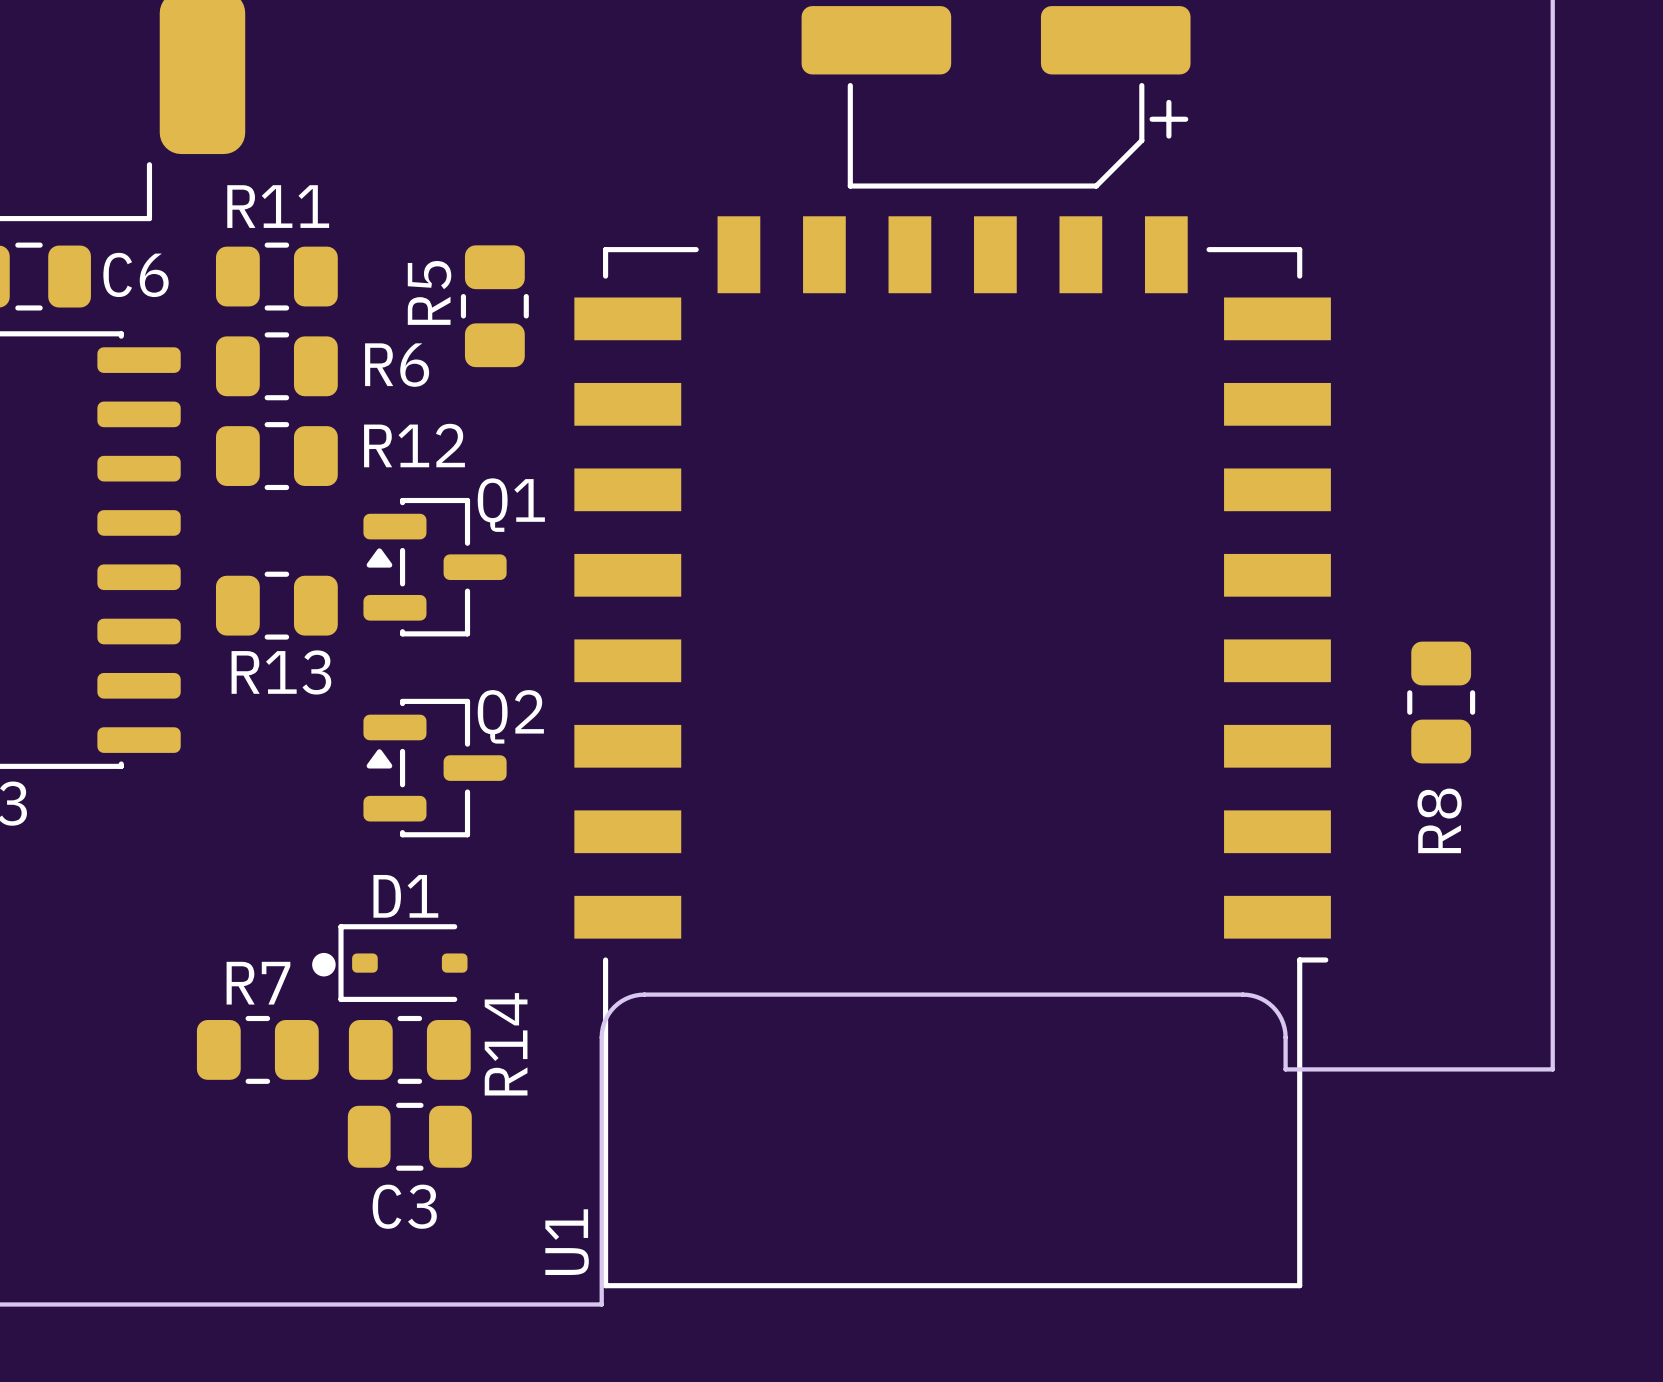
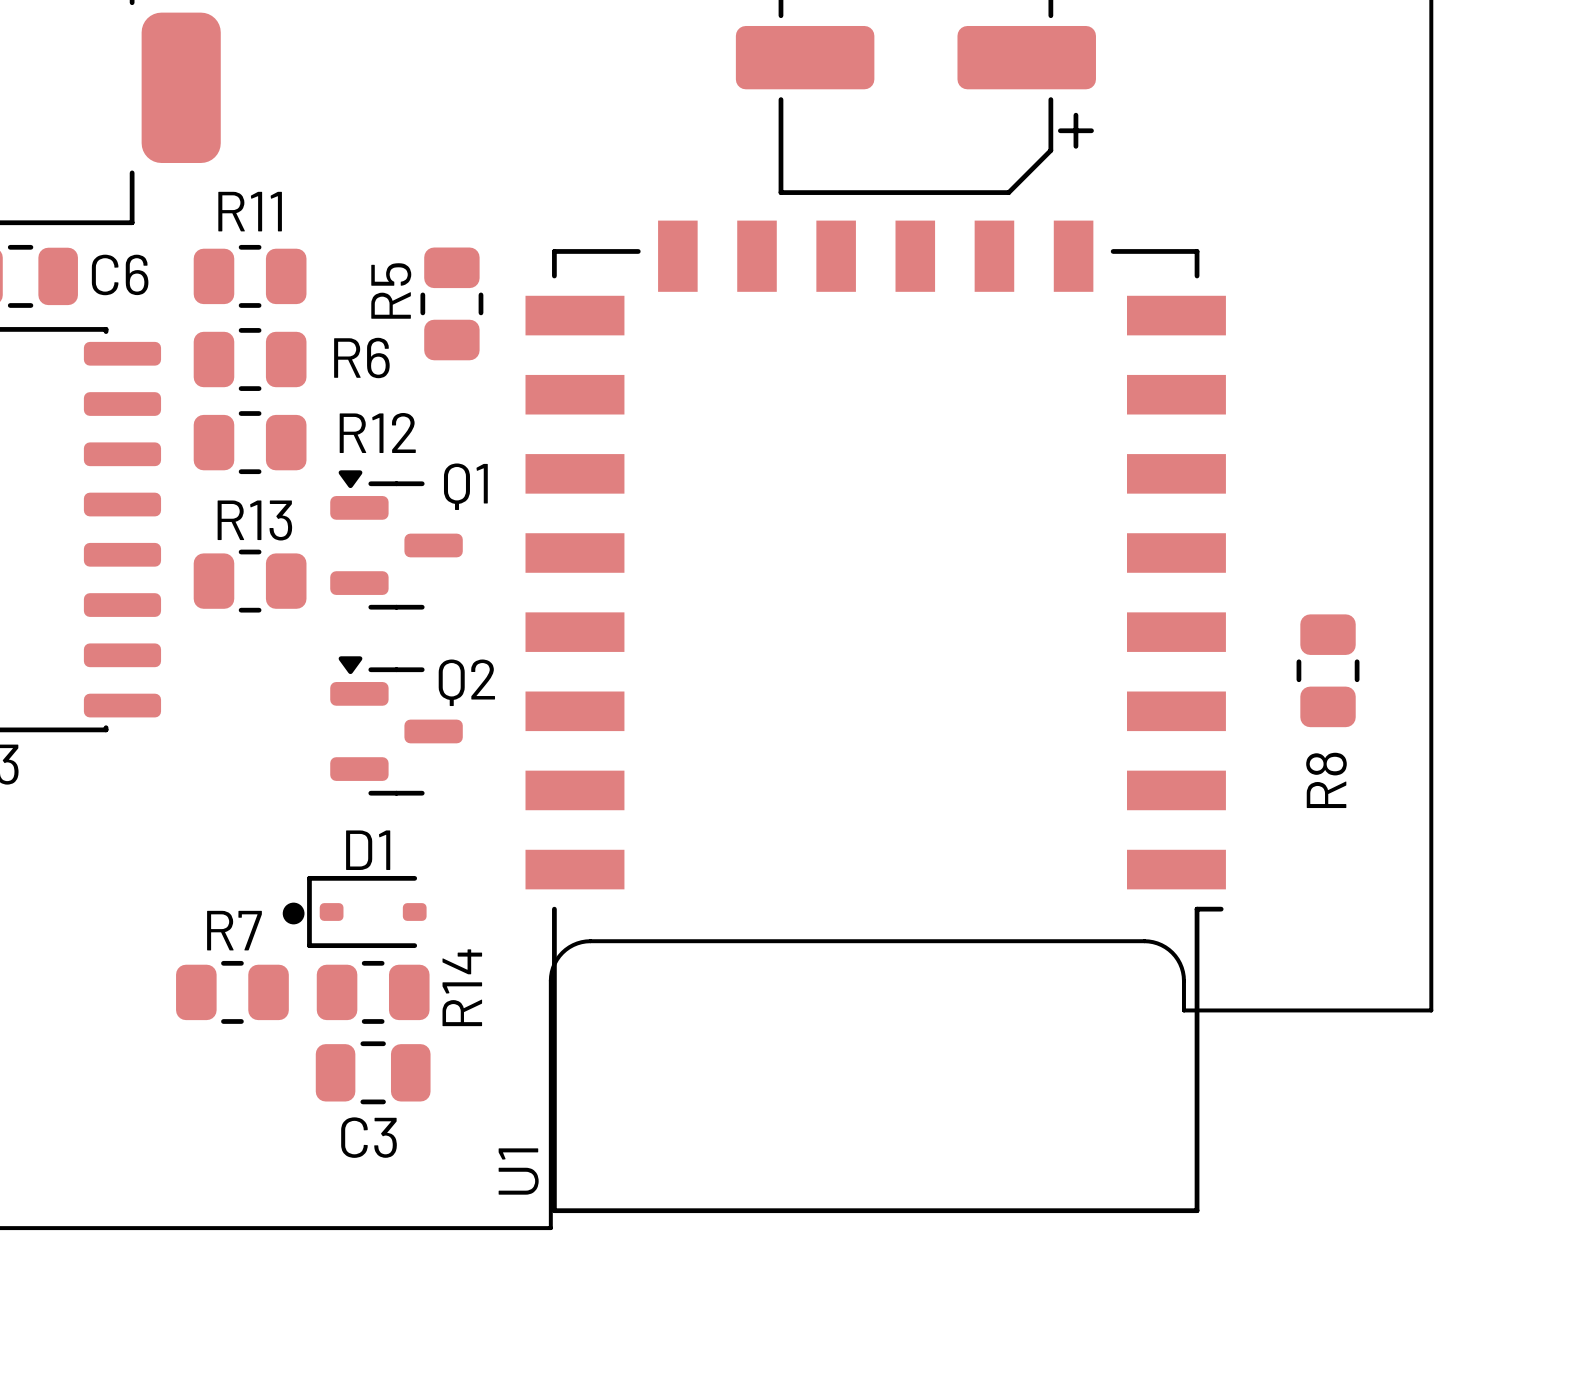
Q1 footprint: [363, 497, 507, 637] -> [330, 470, 463, 610]
R13 name position: R13 (281, 672) -> R13 (254, 520)
Q2 footprint: [363, 698, 507, 838] -> [330, 656, 463, 796]

